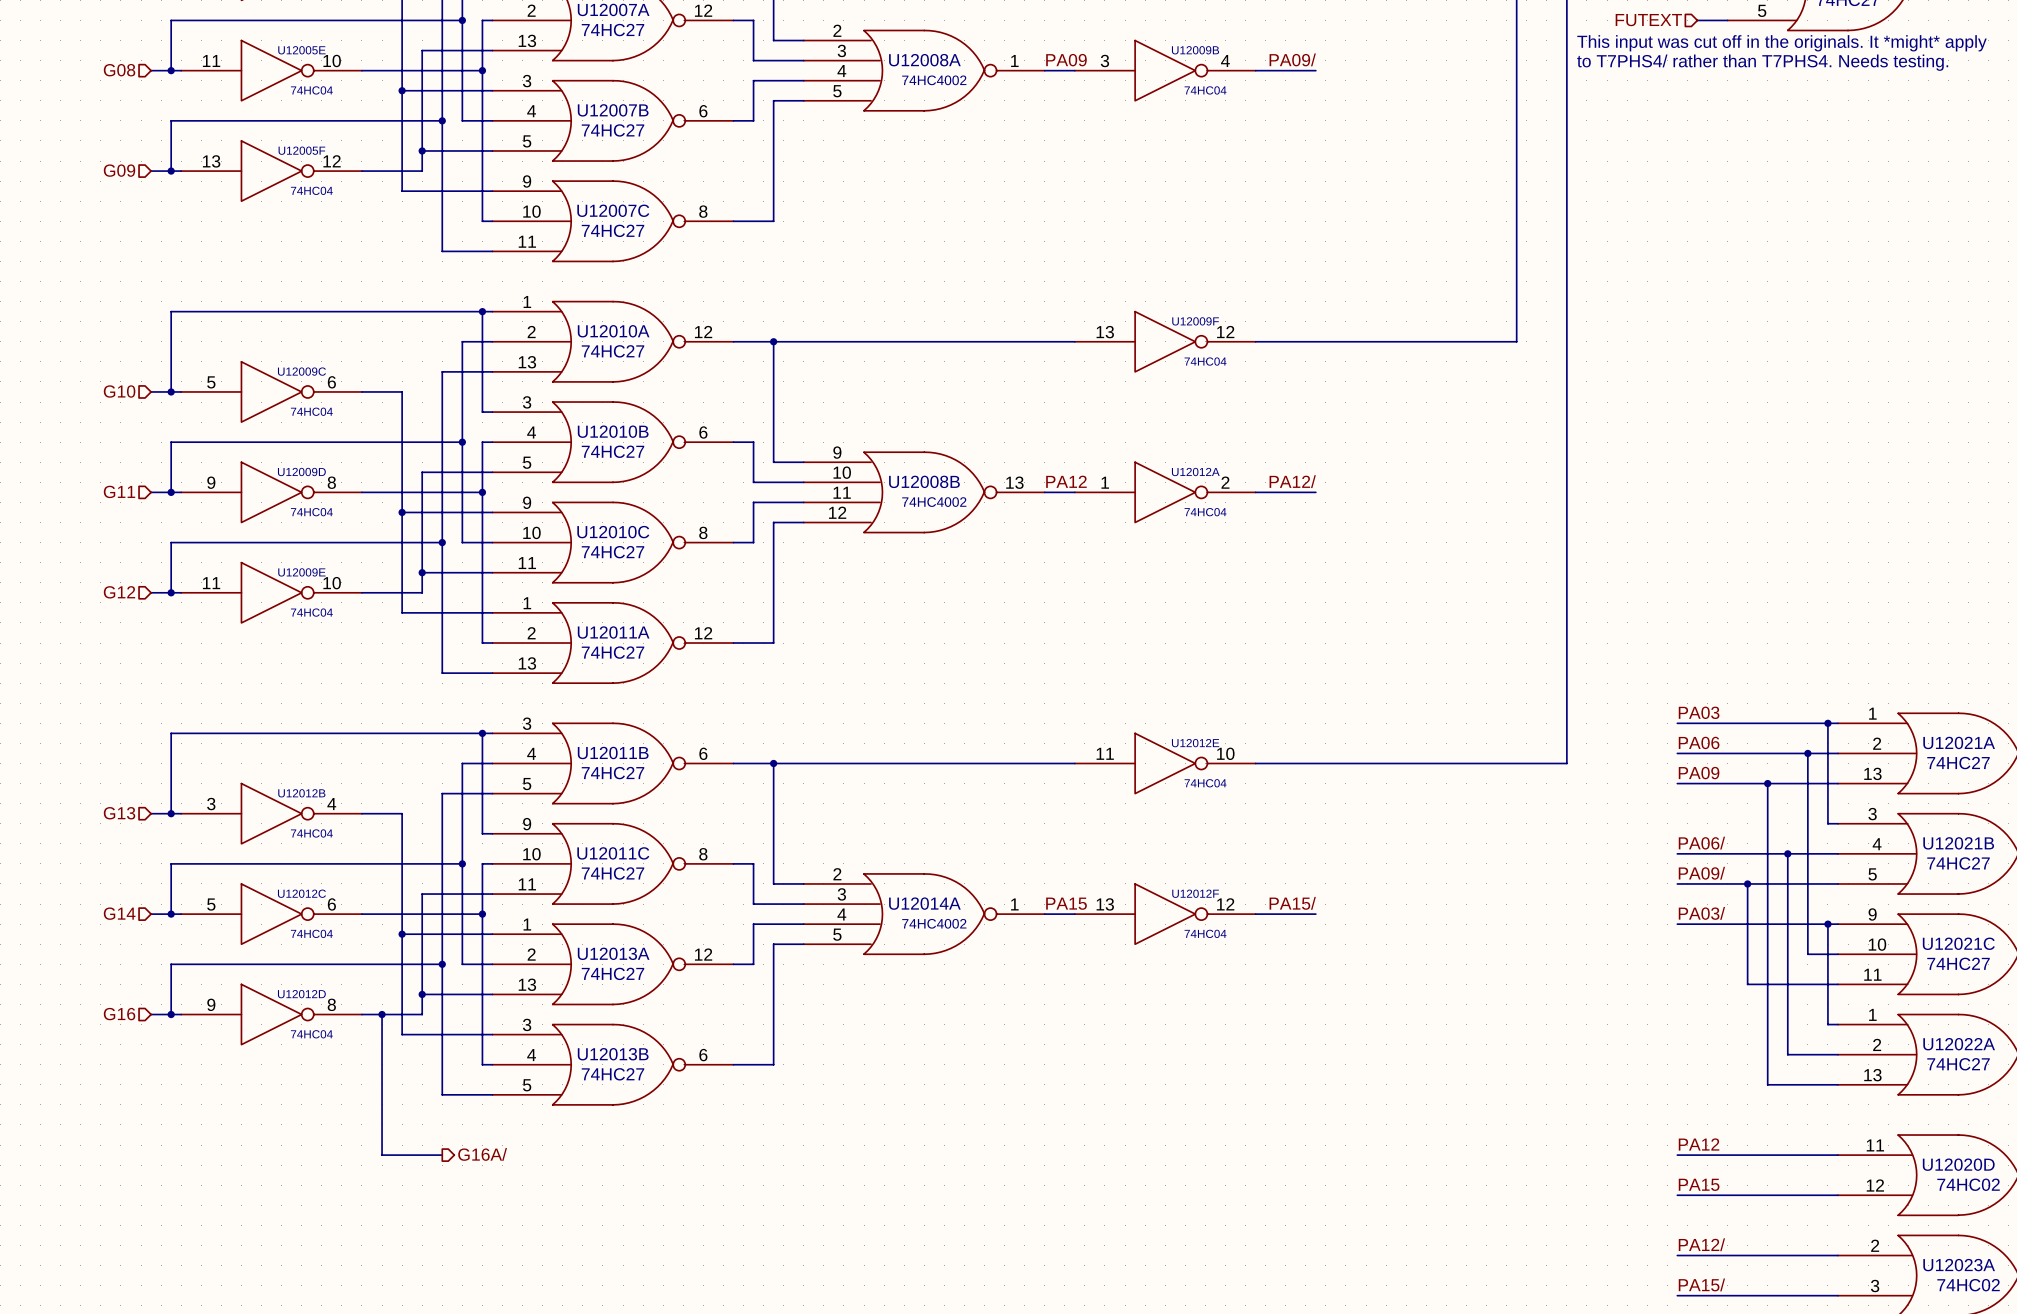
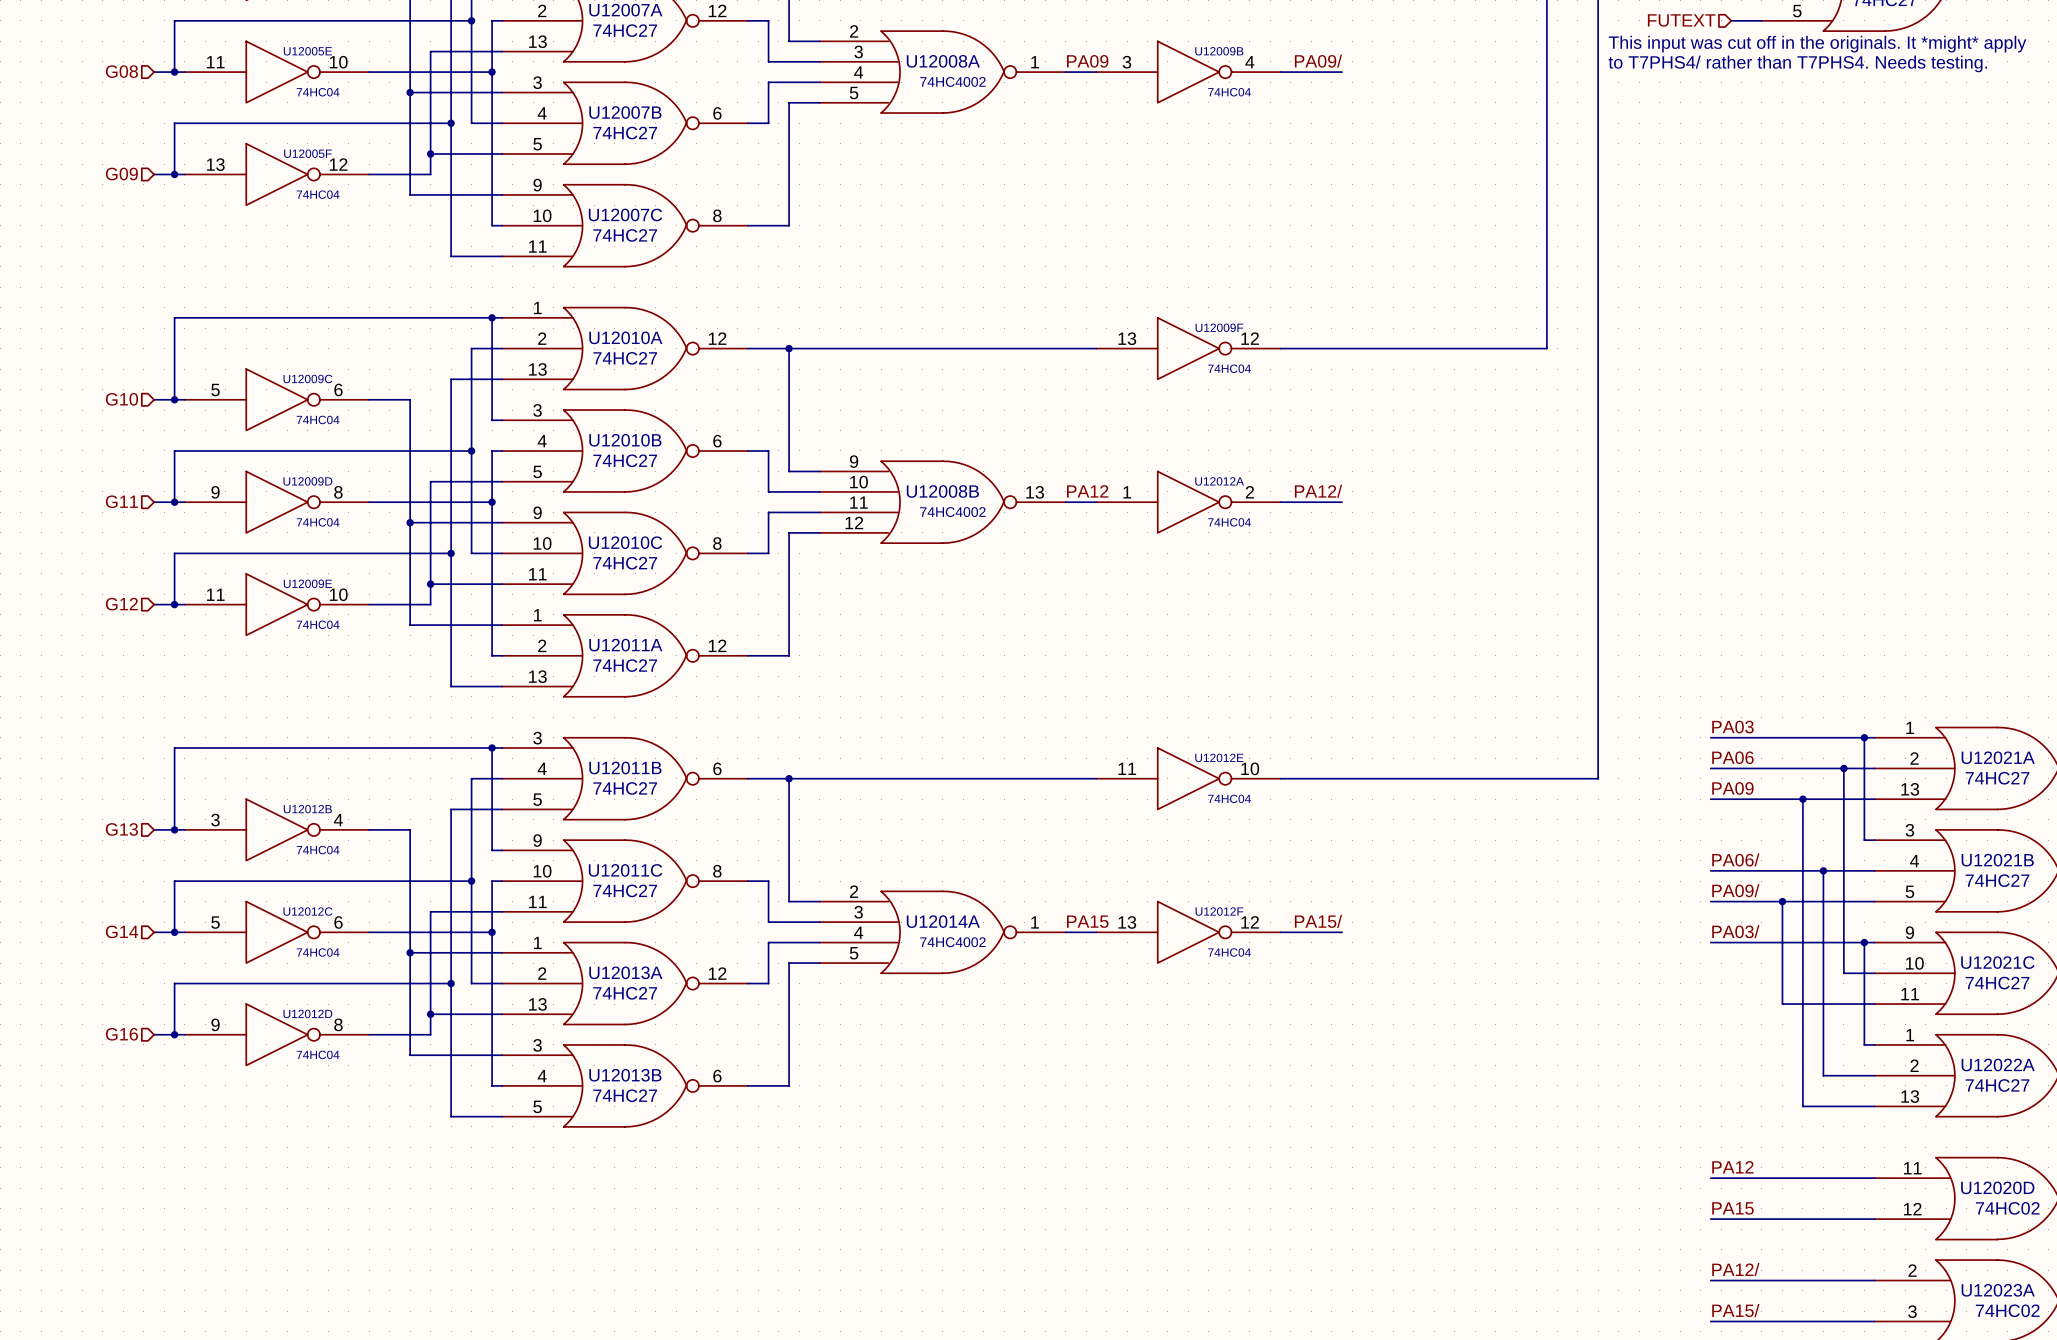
wire: (382, 1014) (382, 1155) (442, 1155) -> none
junction: (382, 1014) -> none
hierarchical label: G16A/ (482, 1154) -> none

